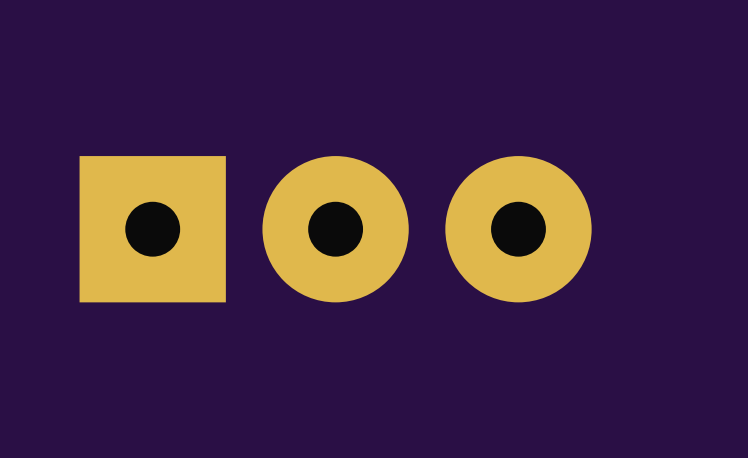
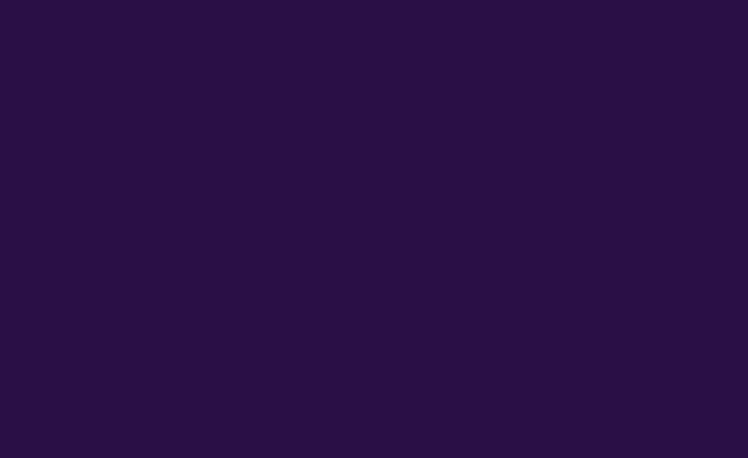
part: (335, 229) -> none

